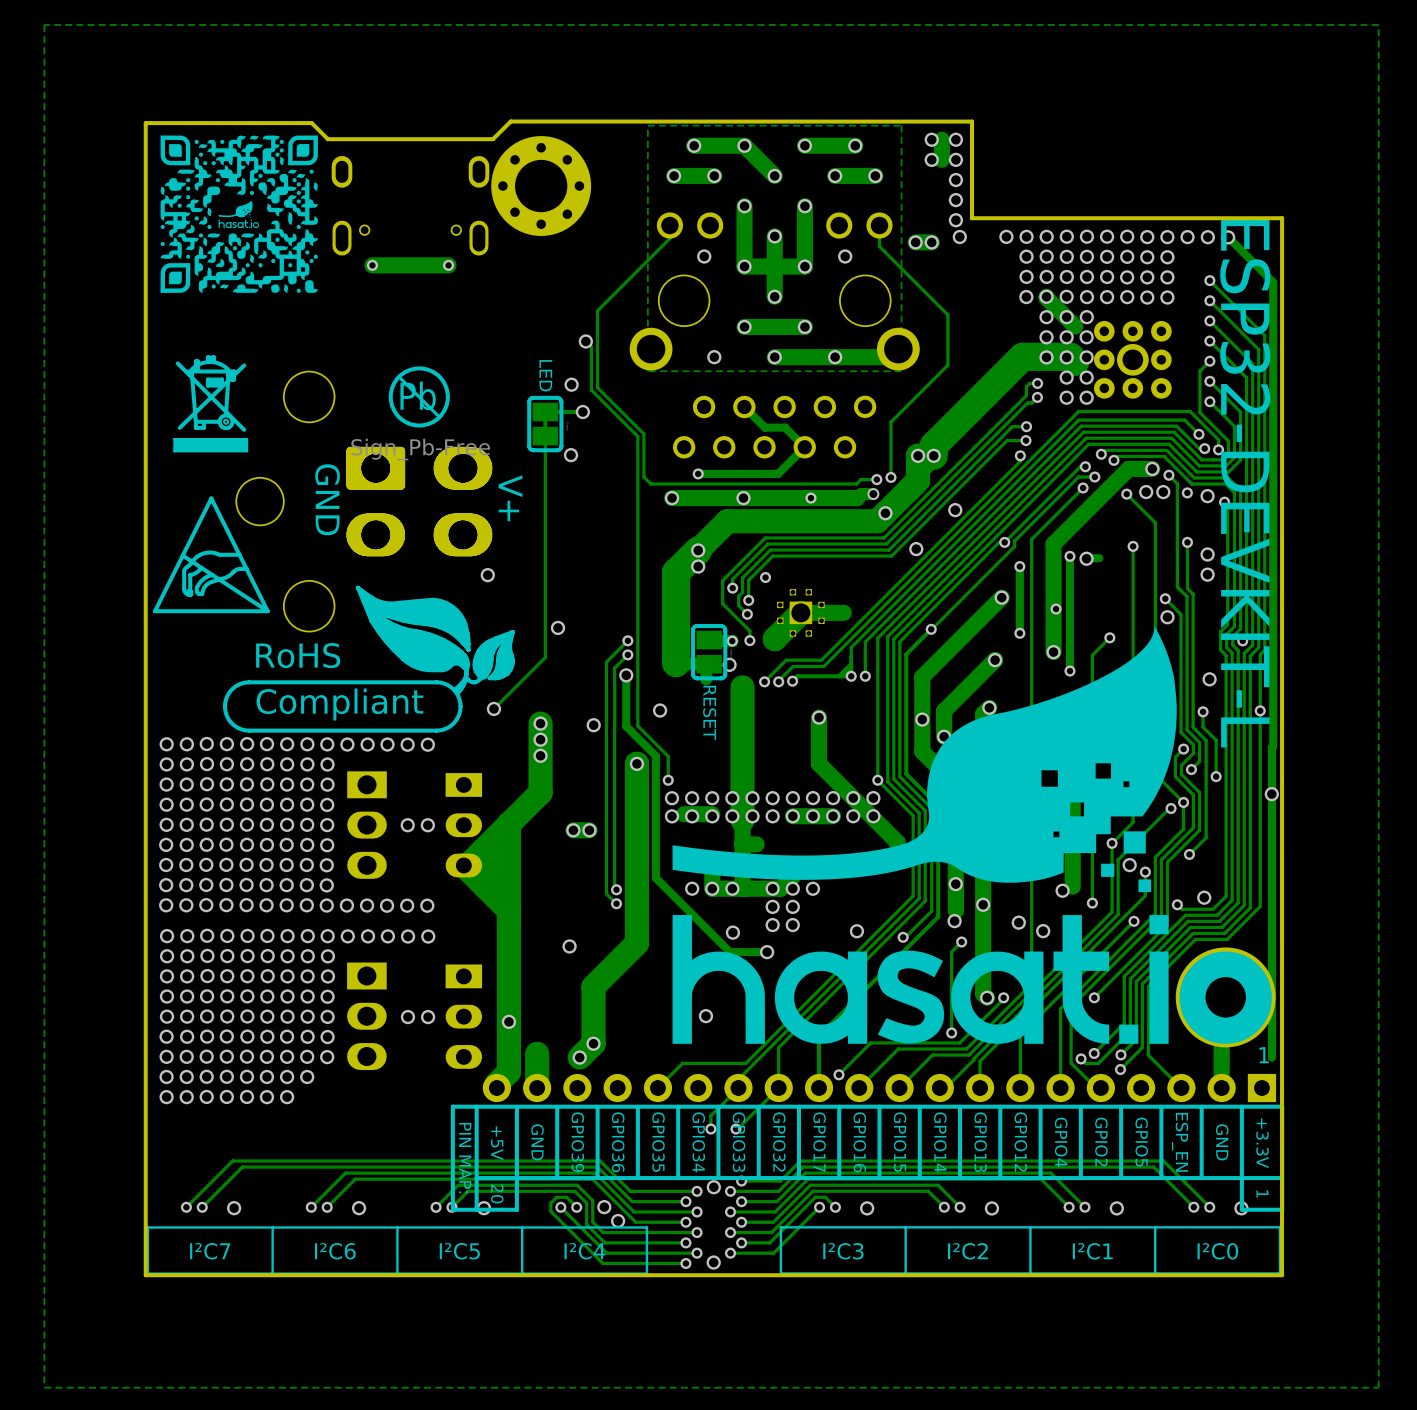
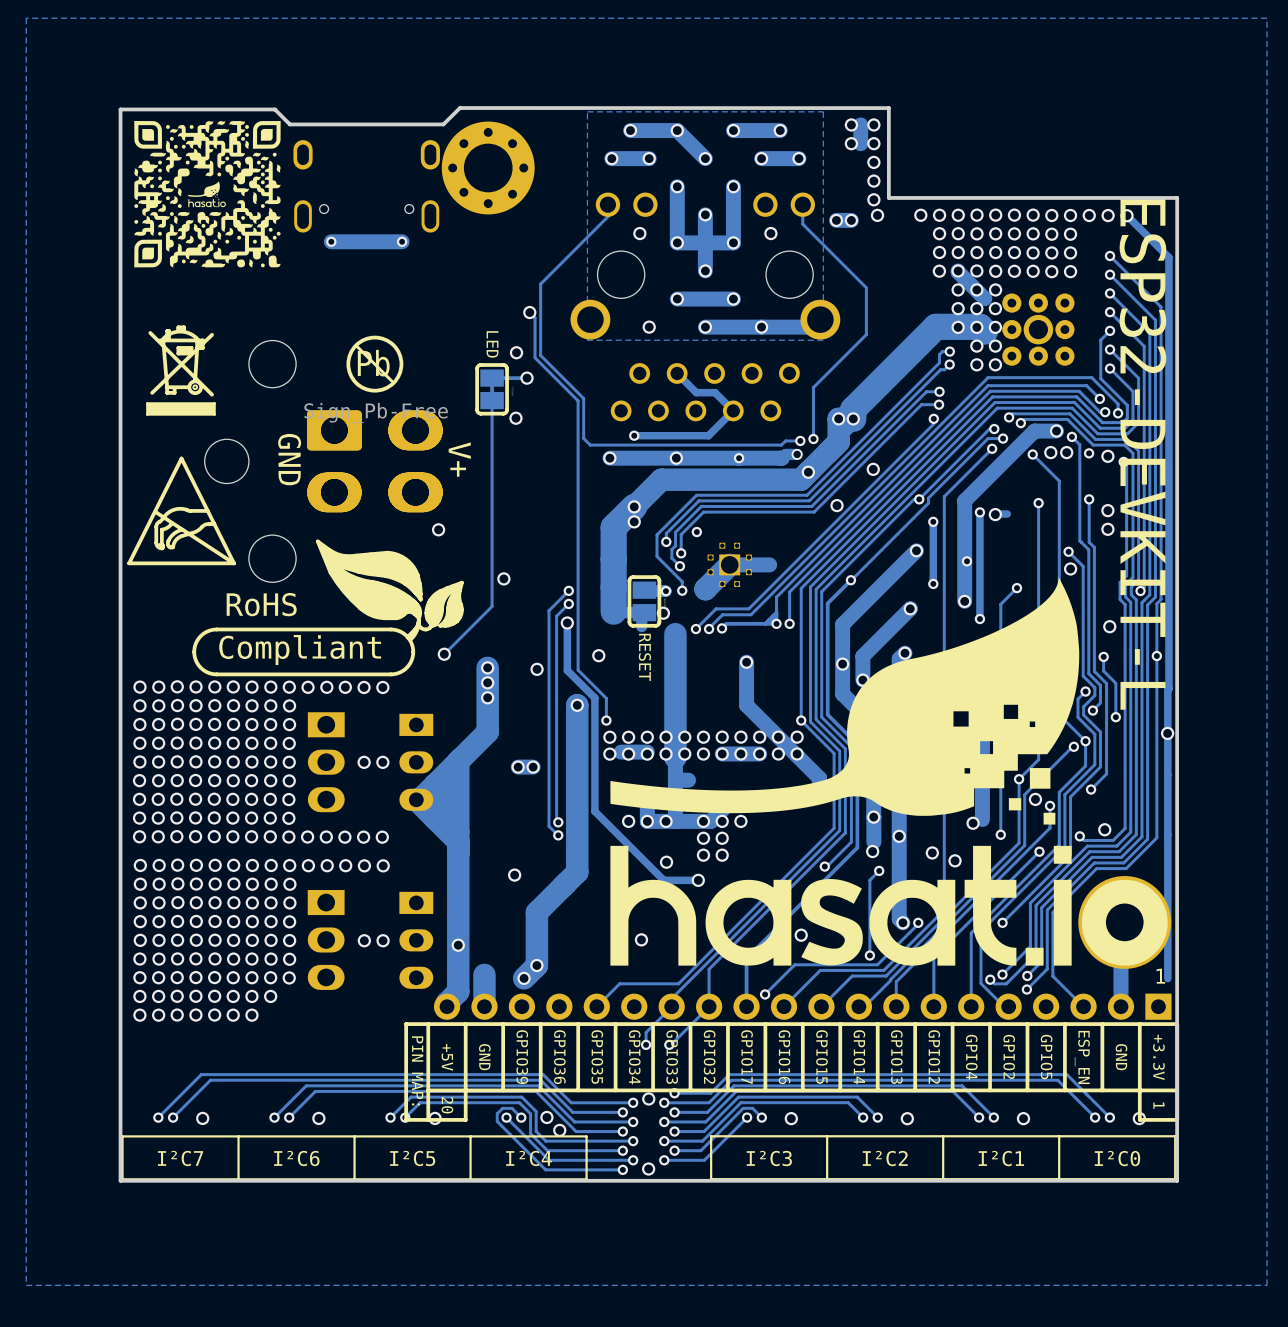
via position: (856, 931) -> (801, 935)

